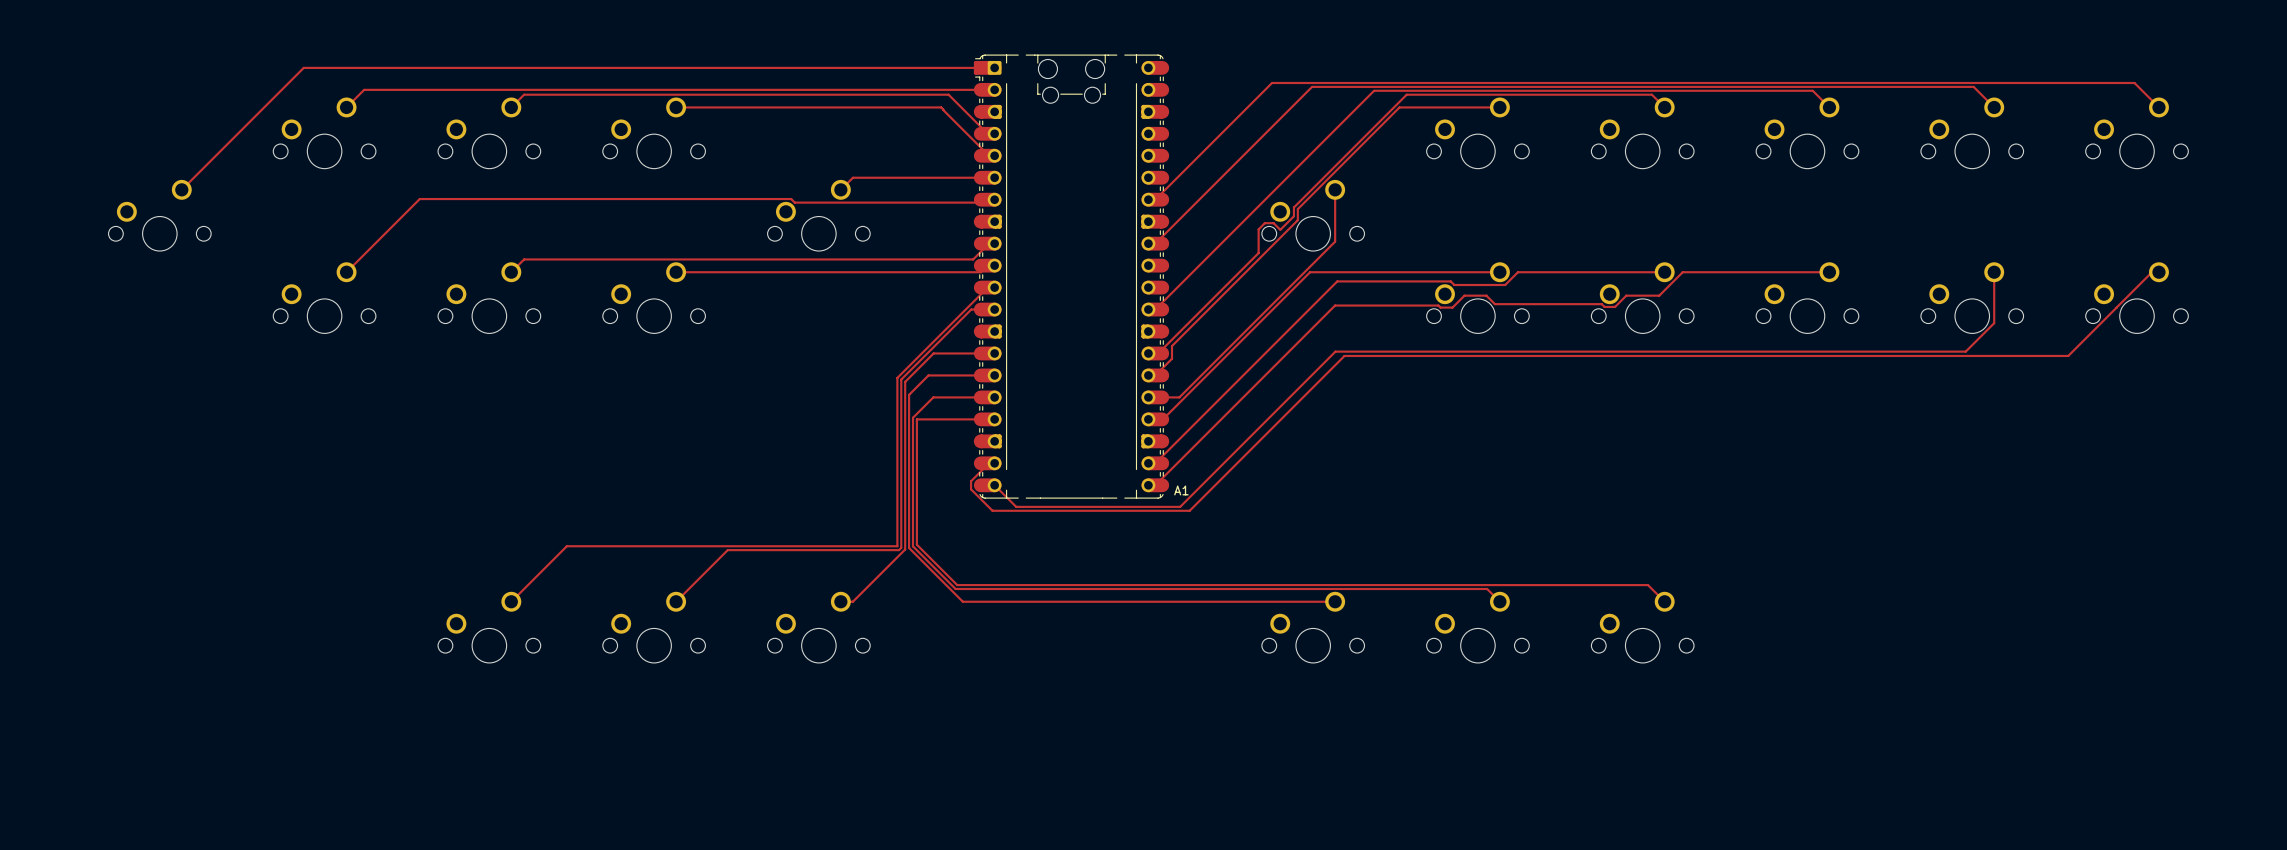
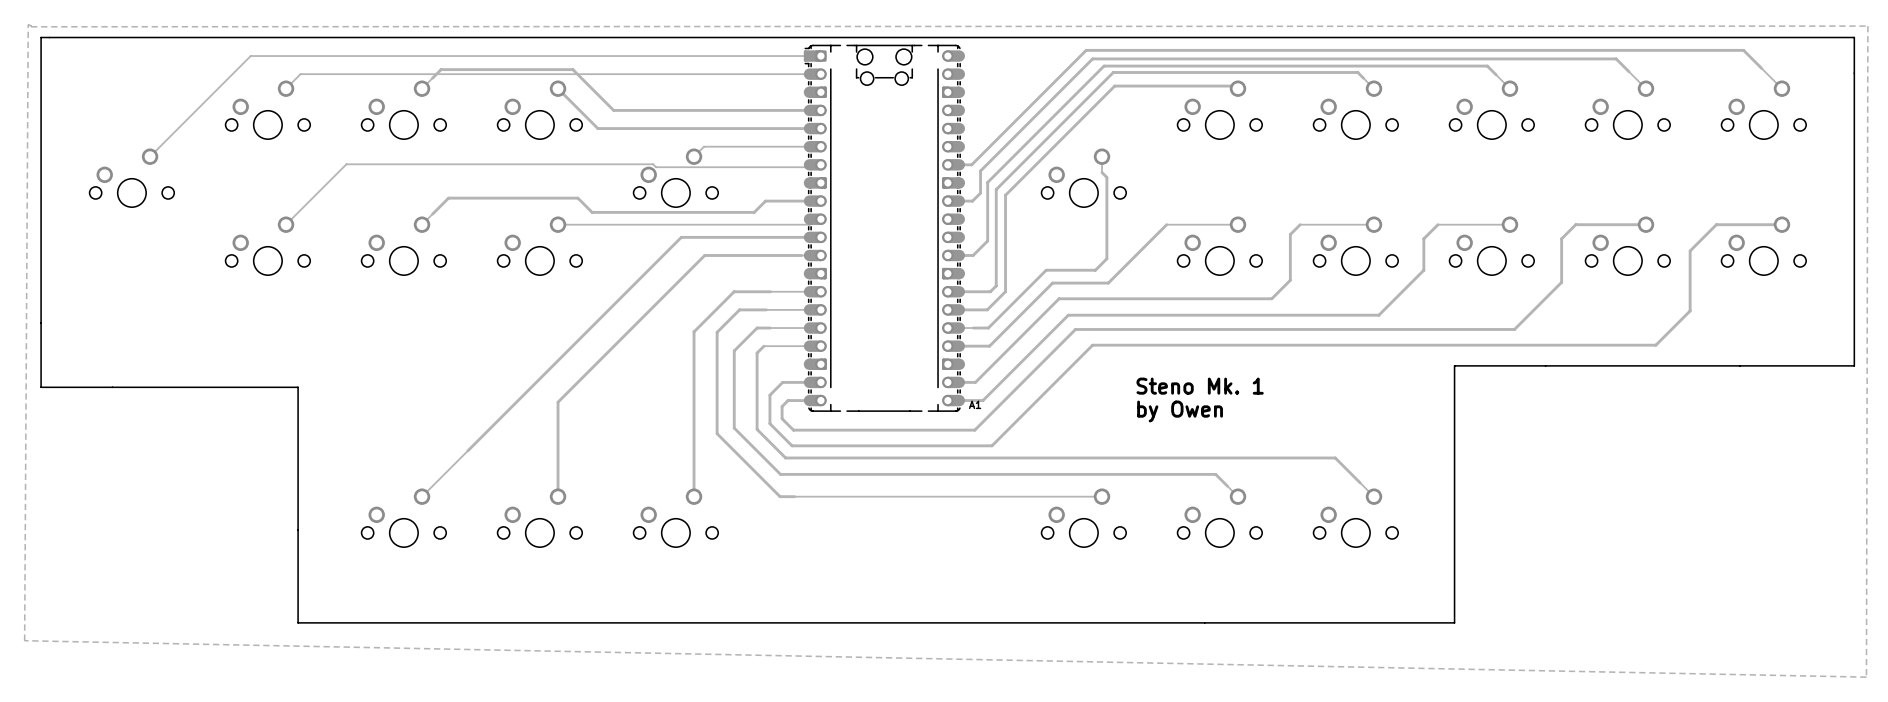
zone outline: none -> (28, 24) (24, 640) (1866, 677) (1867, 26) (31, 26) (28, 24)
board edge: none -> (41, 37) (41, 387) (298, 387) (298, 622) (1454, 622) (1454, 365) (1854, 365) (1854, 37) (41, 37)
track: (2134, 82) (1272, 82) (1155, 199) -> (1761, 68) (1743, 50) (1086, 50) (971, 164) (953, 164)
track: (1973, 86) (1312, 86) (1155, 243) -> (1629, 71) (1616, 58) (1092, 58) (980, 171) (980, 193) (972, 201) (953, 201)
track: (1812, 90) (1374, 90) (1155, 309) -> (1496, 74) (1487, 66) (1104, 66) (987, 182) (987, 240) (973, 255) (953, 255)
track: (524, 94) (948, 94) (987, 133) -> (432, 78) (441, 69) (572, 69) (613, 110) (815, 110)
track: (1651, 94) (1406, 94) (1293, 207) (1293, 216) (1280, 229) (1273, 223) (1264, 223) (1258, 229) (1258, 253) (1158, 353) -> (1363, 78) (1357, 72) (1113, 72) (996, 189) (996, 285) (990, 291) (955, 291)
track: (676, 107) (941, 107) (988, 155) -> (558, 88) (597, 128) (816, 128)
track: (1499, 107) (1399, 107) (1297, 209) (1297, 220) (1171, 346) (1171, 358) (1155, 375) -> (1238, 88) (1235, 86) (1114, 86) (1005, 195) (1005, 291) (987, 309) (953, 309)
track: (1335, 209) (1335, 241) (1179, 397) -> (1102, 172) (1106, 177) (1106, 258) (1095, 270) (1046, 270) (988, 328) (973, 328)
track: (988, 243) (973, 259) (524, 259) -> (816, 201) (765, 201) (754, 212) (592, 212) (577, 198) (448, 198) (432, 214)
track: (1413, 272) (1310, 272) (1162, 419) -> (1166, 224) (1108, 283) (1052, 283) (989, 346) (959, 346)
track: (1575, 272) (1517, 272) (1505, 284) (1454, 284) (1450, 281) (1337, 281) (1155, 463) -> (1300, 224) (1290, 234) (1290, 280) (1271, 298) (1059, 298) (975, 382) (953, 382)
track: (1742, 272) (1682, 272) (1659, 295) (1626, 295) (1615, 306) (1604, 306) (1601, 304) (1494, 304) (1486, 295) (1464, 295) (1452, 307) (1440, 307) (1438, 305) (1335, 305) (1155, 485) -> (1437, 224) (1423, 238) (1423, 270) (1378, 315) (1068, 315) (983, 400) (953, 400)
track: (1994, 272) (1994, 323) (1965, 351) (1335, 351) (1180, 506) (1016, 506) (994, 485) -> (1645, 224) (1575, 224) (1561, 238) (1561, 282) (1514, 329) (1075, 329) (974, 430) (793, 430) (782, 418) (782, 406) (788, 400) (820, 400)
track: (2151, 272) (2068, 355) (1344, 355) (1189, 510) (992, 510) (971, 489) (971, 481) (988, 463) -> (1776, 224) (1716, 224) (1690, 250) (1690, 310) (1655, 345) (1092, 345) (991, 445) (792, 445) (769, 423) (769, 395) (782, 382) (816, 382)
track: (987, 287) (897, 377) (897, 546) (566, 546) -> (820, 237) (681, 237) (467, 450)
track: (971, 309) (901, 379) (901, 547) (898, 550) (727, 550) (676, 601) -> (801, 255) (704, 255) (558, 402) (558, 496)
track: (933, 353) (905, 381) (905, 549) (852, 601) (840, 601) -> (770, 291) (734, 291) (694, 331) (694, 496)
track: (928, 375) (909, 394) (909, 547) (962, 601) -> (766, 309) (739, 309) (717, 332) (717, 433) (780, 496) (794, 496)
track: (933, 397) (912, 417) (912, 546) (955, 588) (1487, 588) -> (770, 328) (757, 328) (734, 350) (734, 428) (780, 474) (1215, 474) (1227, 486)
track: (925, 419) (916, 419) (916, 544) (957, 585) (1648, 585) -> (763, 346) (757, 353) (757, 429) (785, 457) (1335, 457) (1360, 482)
text: none -> Steno Mk. 1 (1200, 386)
text: none -> by Owen (1180, 411)

